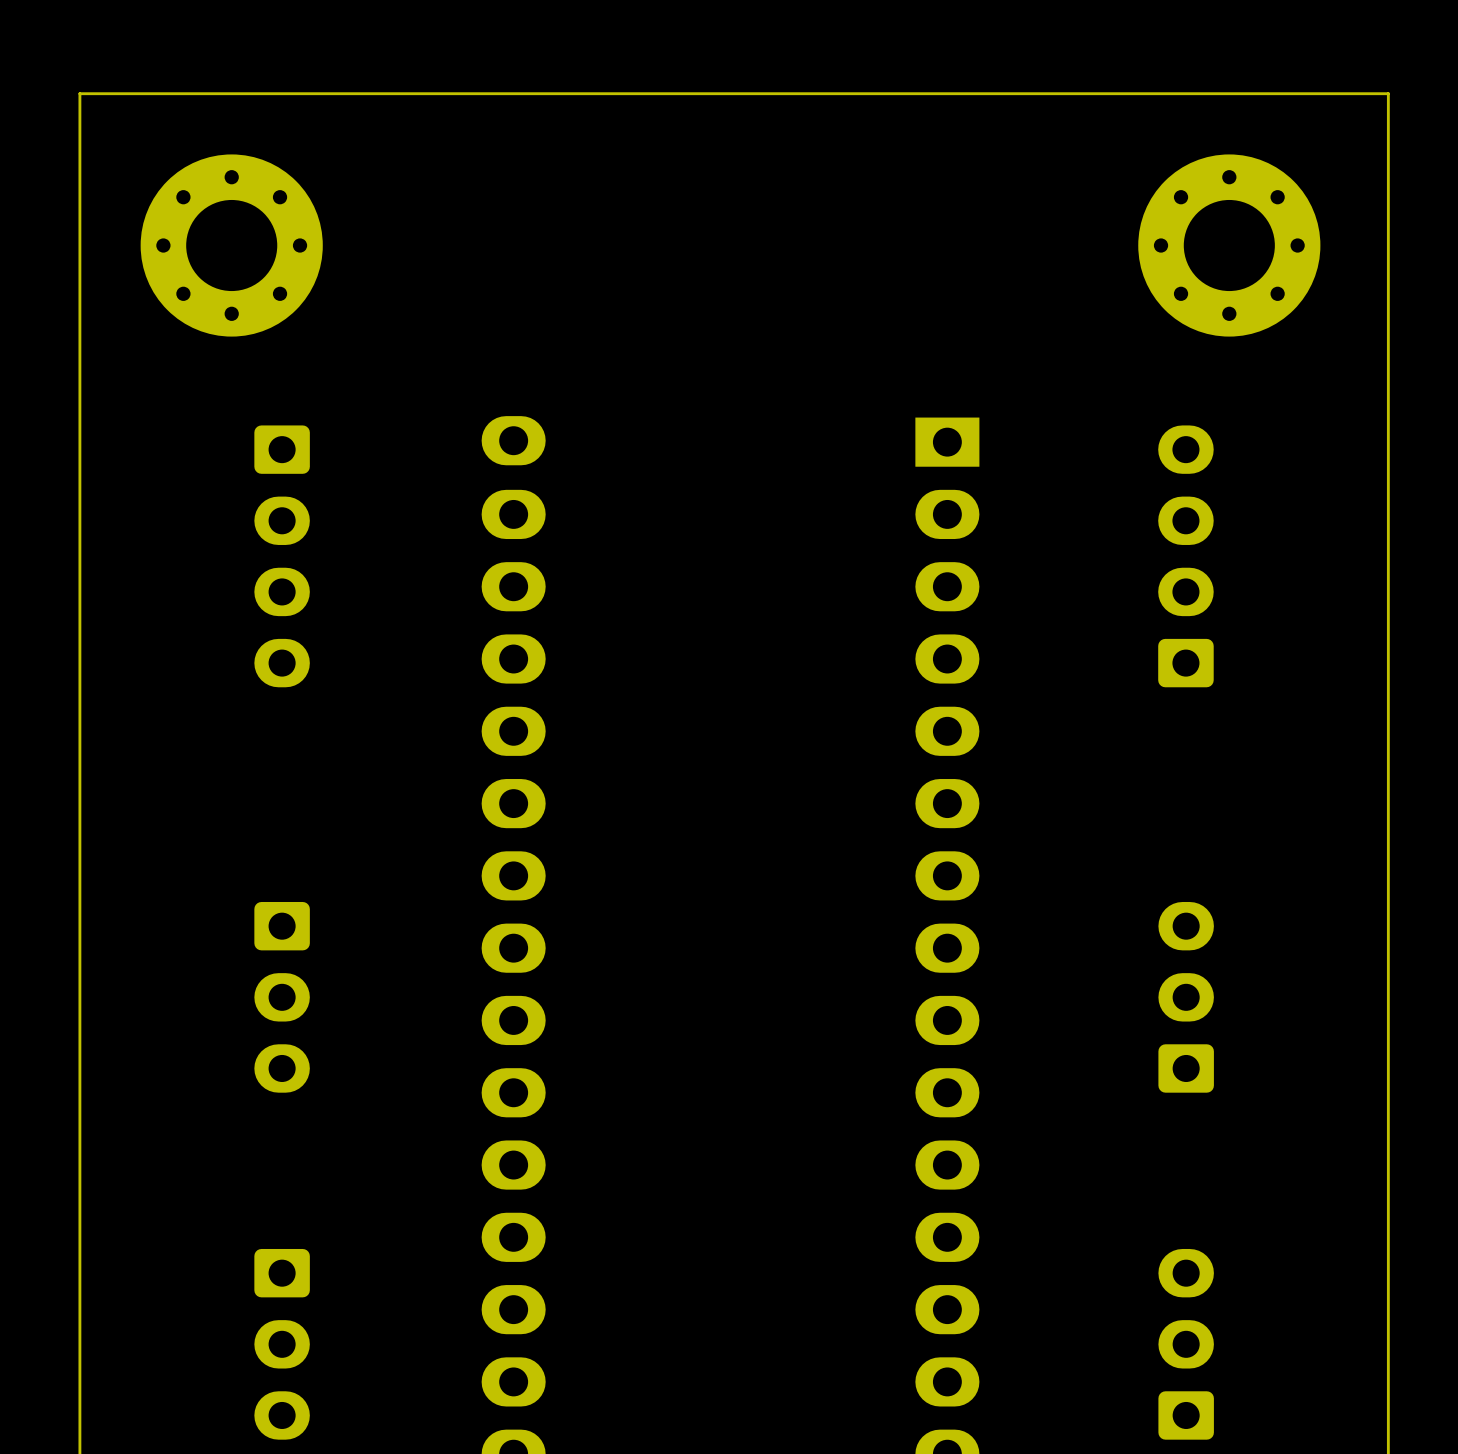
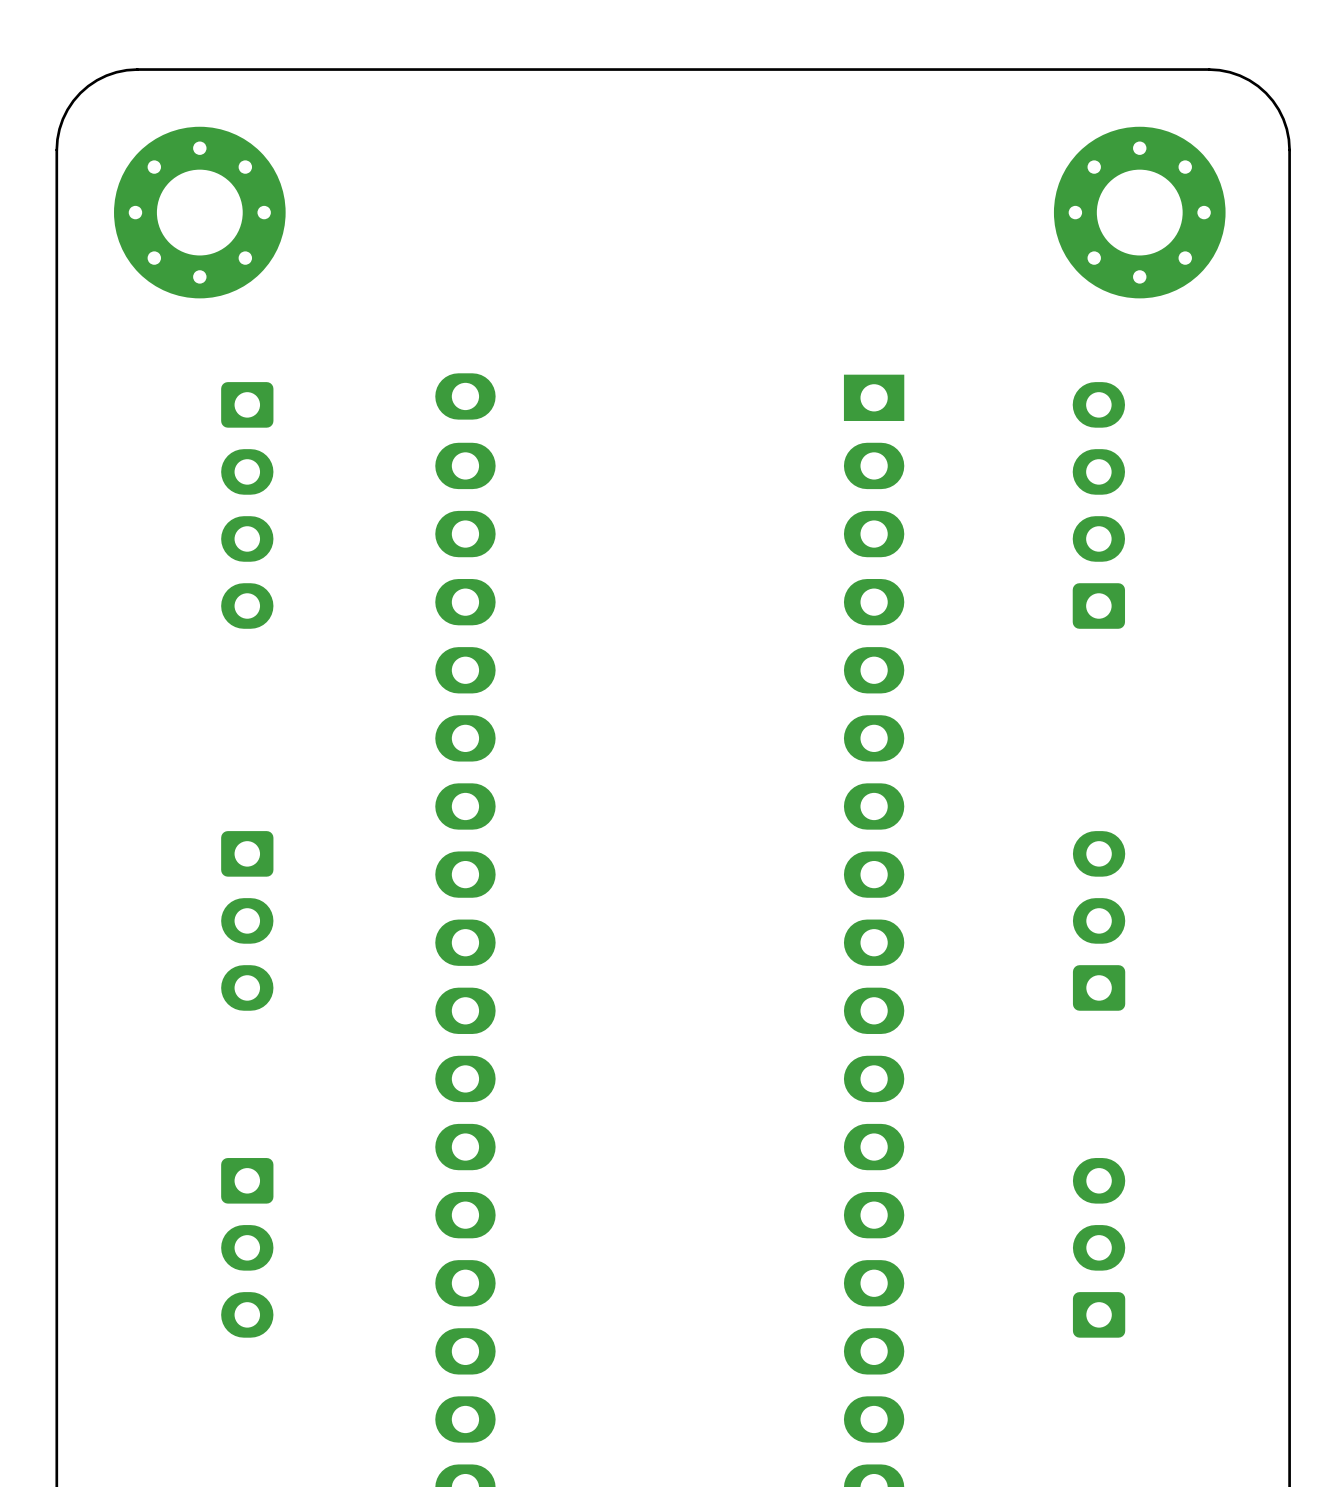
board edge: (165, 93) (79, 93) (79, 179) -> (137, 69) (106, 75) (80, 93) (62, 119) (56, 149)
board edge: (1302, 93) (1388, 93) (1388, 179) -> (1209, 69) (1239, 75) (1266, 93) (1283, 119) (1289, 149)

